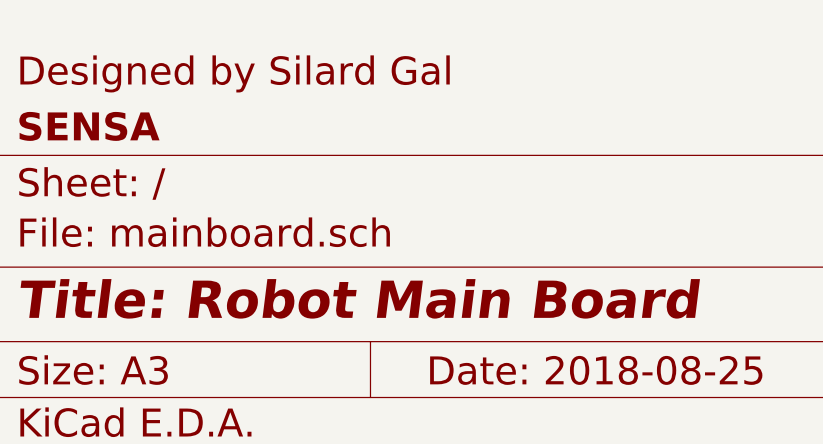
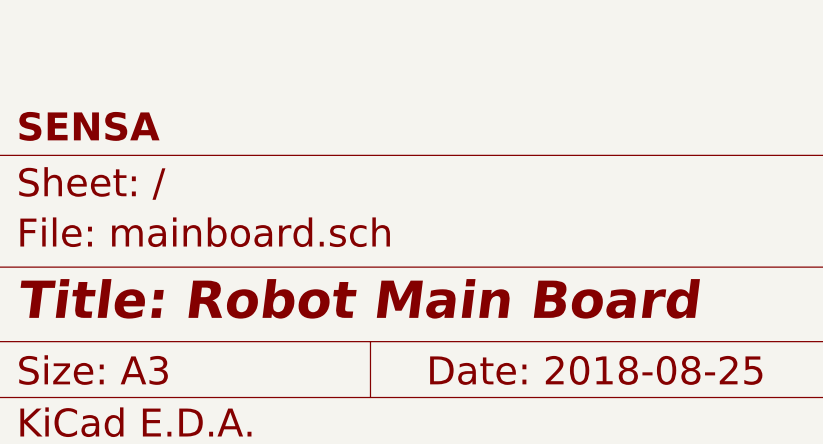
title block: Designed by Silard Gal (235, 73) -> none

